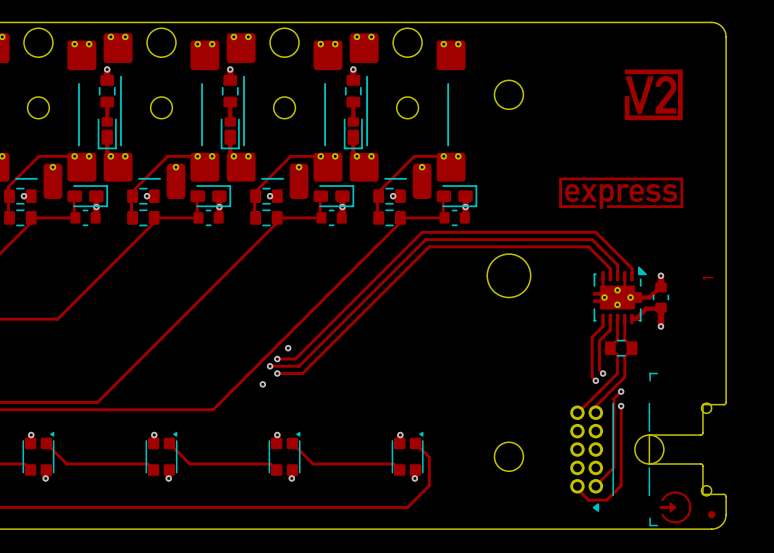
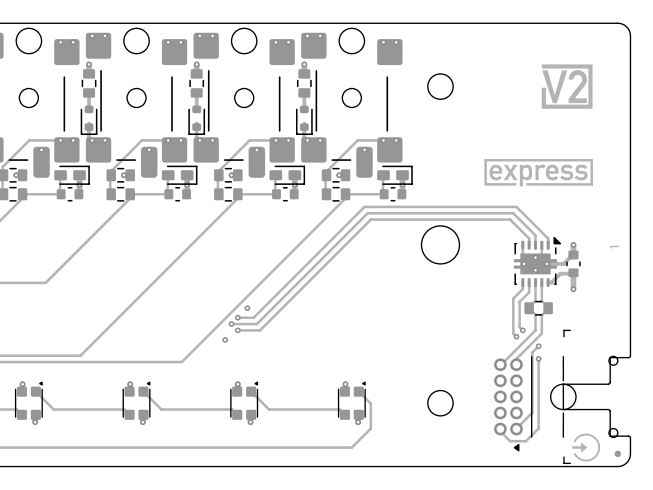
part footprint: [97, 117, 117, 150] -> [80, 105, 98, 135]
part footprint: [220, 117, 240, 150] -> [188, 105, 206, 135]
part footprint: [343, 117, 363, 150] -> [295, 105, 313, 135]

